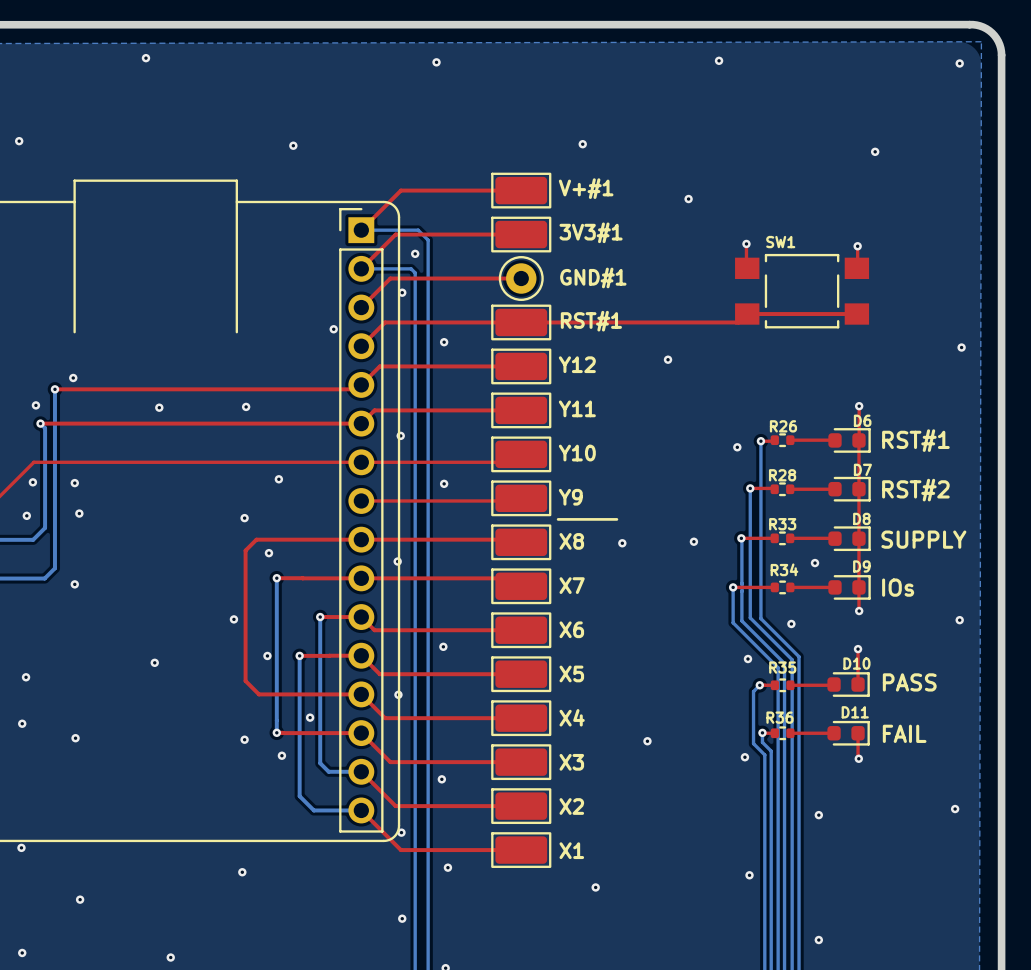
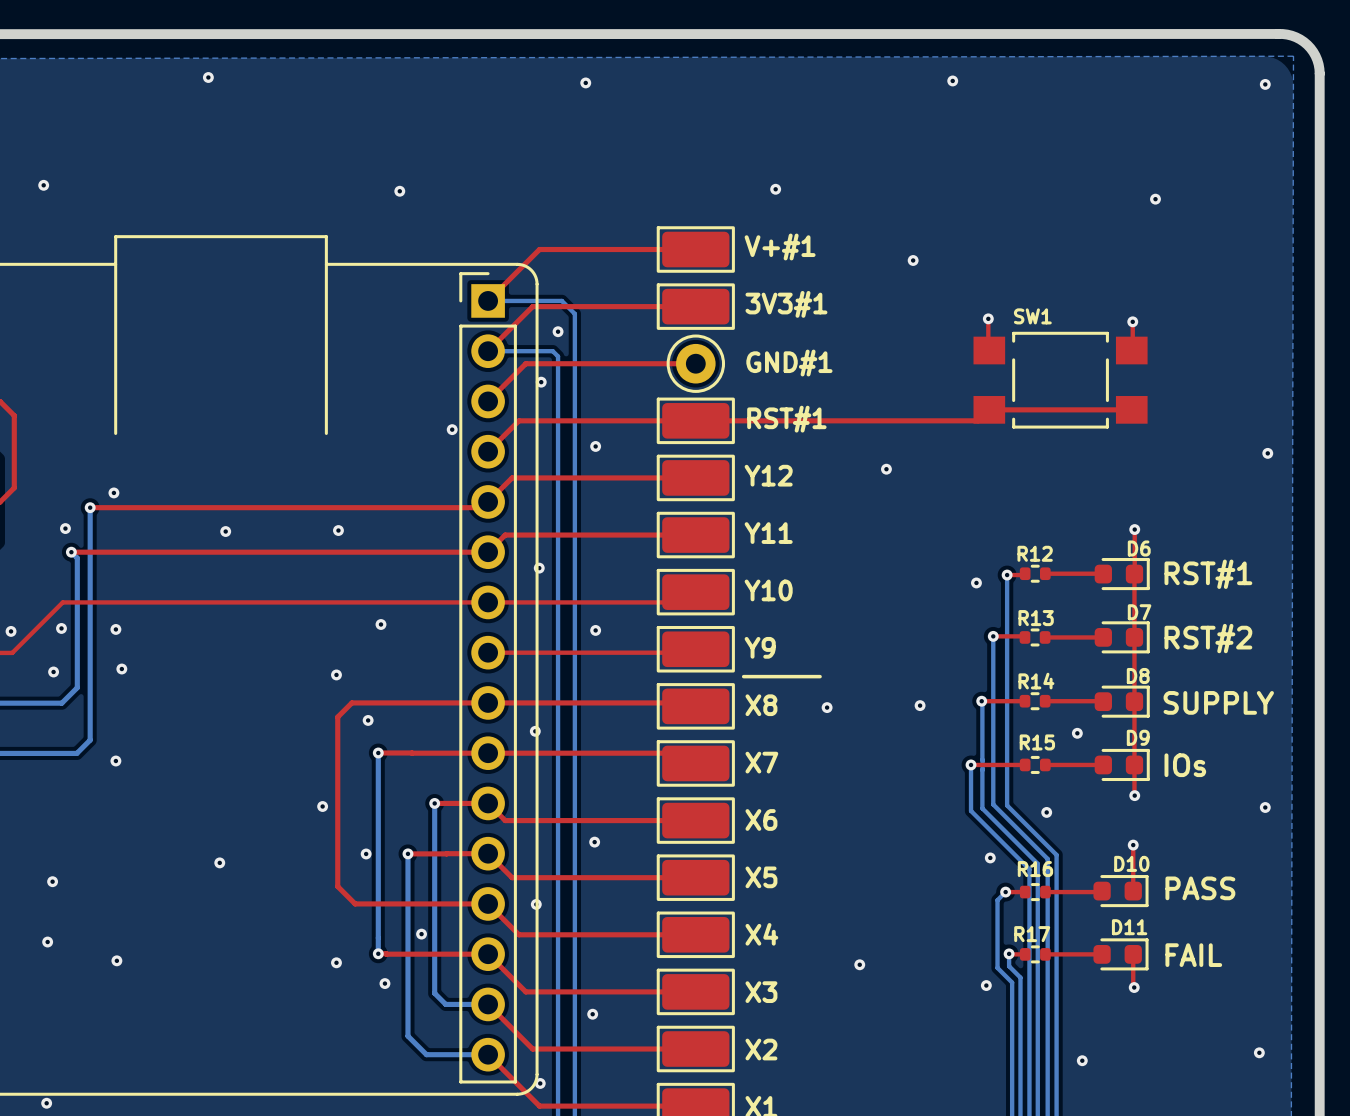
R26 name: R26 (783, 426) -> R12 (1035, 553)
R28 name: R28 (782, 475) -> R13 (1036, 618)
R33 name: R33 (782, 524) -> R14 (1036, 681)
R34 name: R34 (784, 569) -> R15 (1037, 742)
R35 name: R35 (782, 667) -> R16 (1035, 869)
R36 name: R36 (779, 717) -> R17 (1032, 934)

